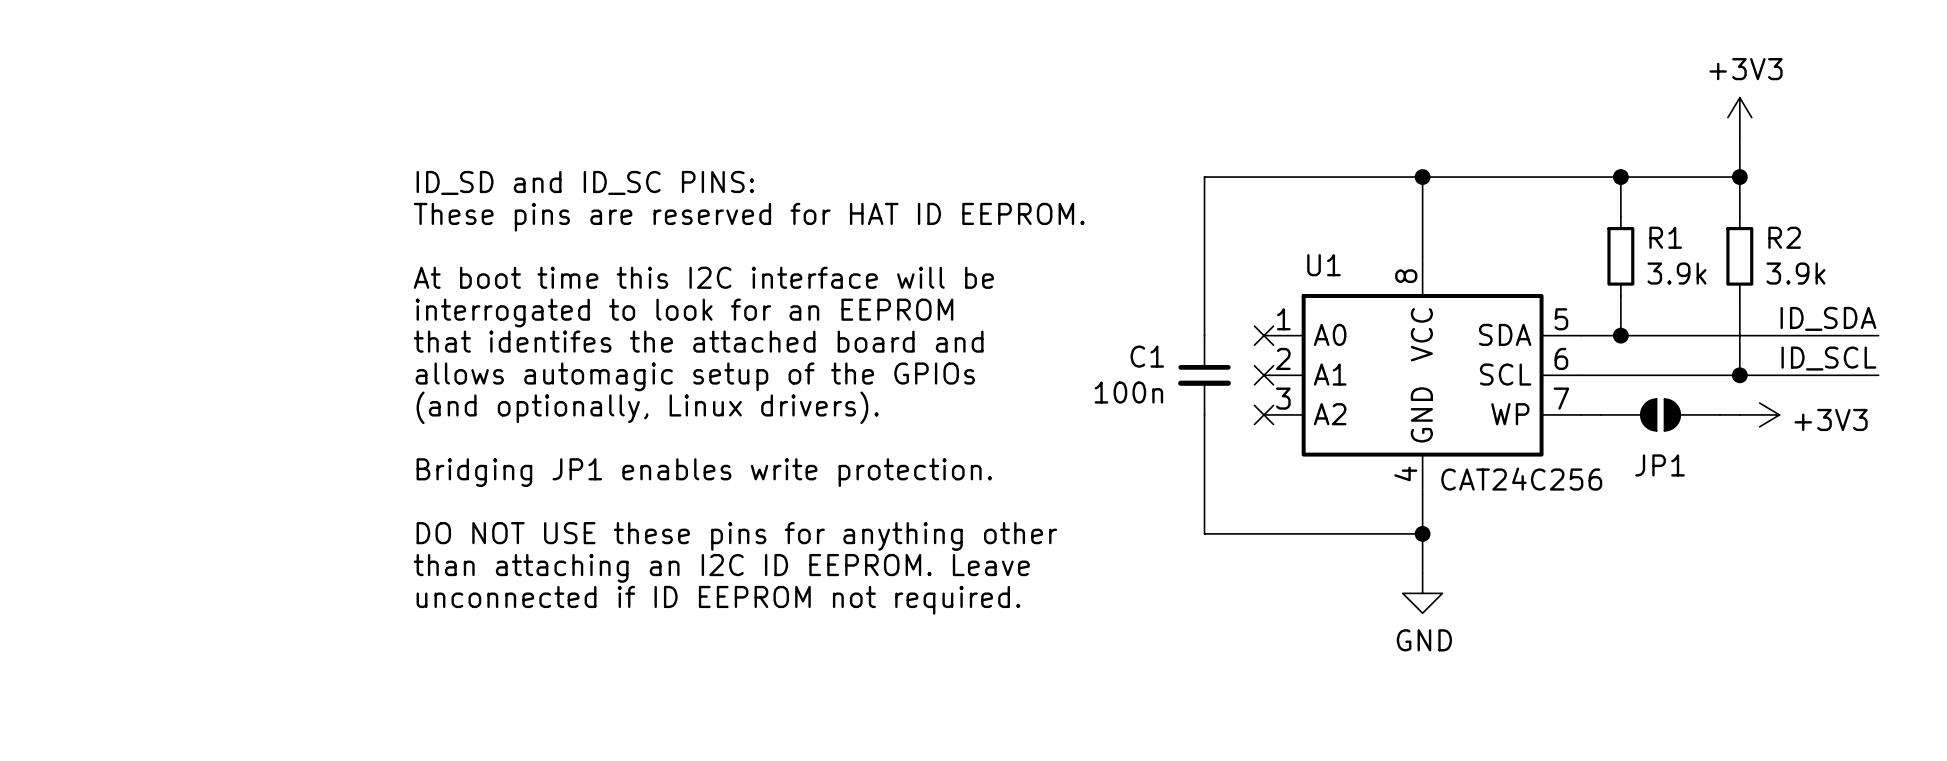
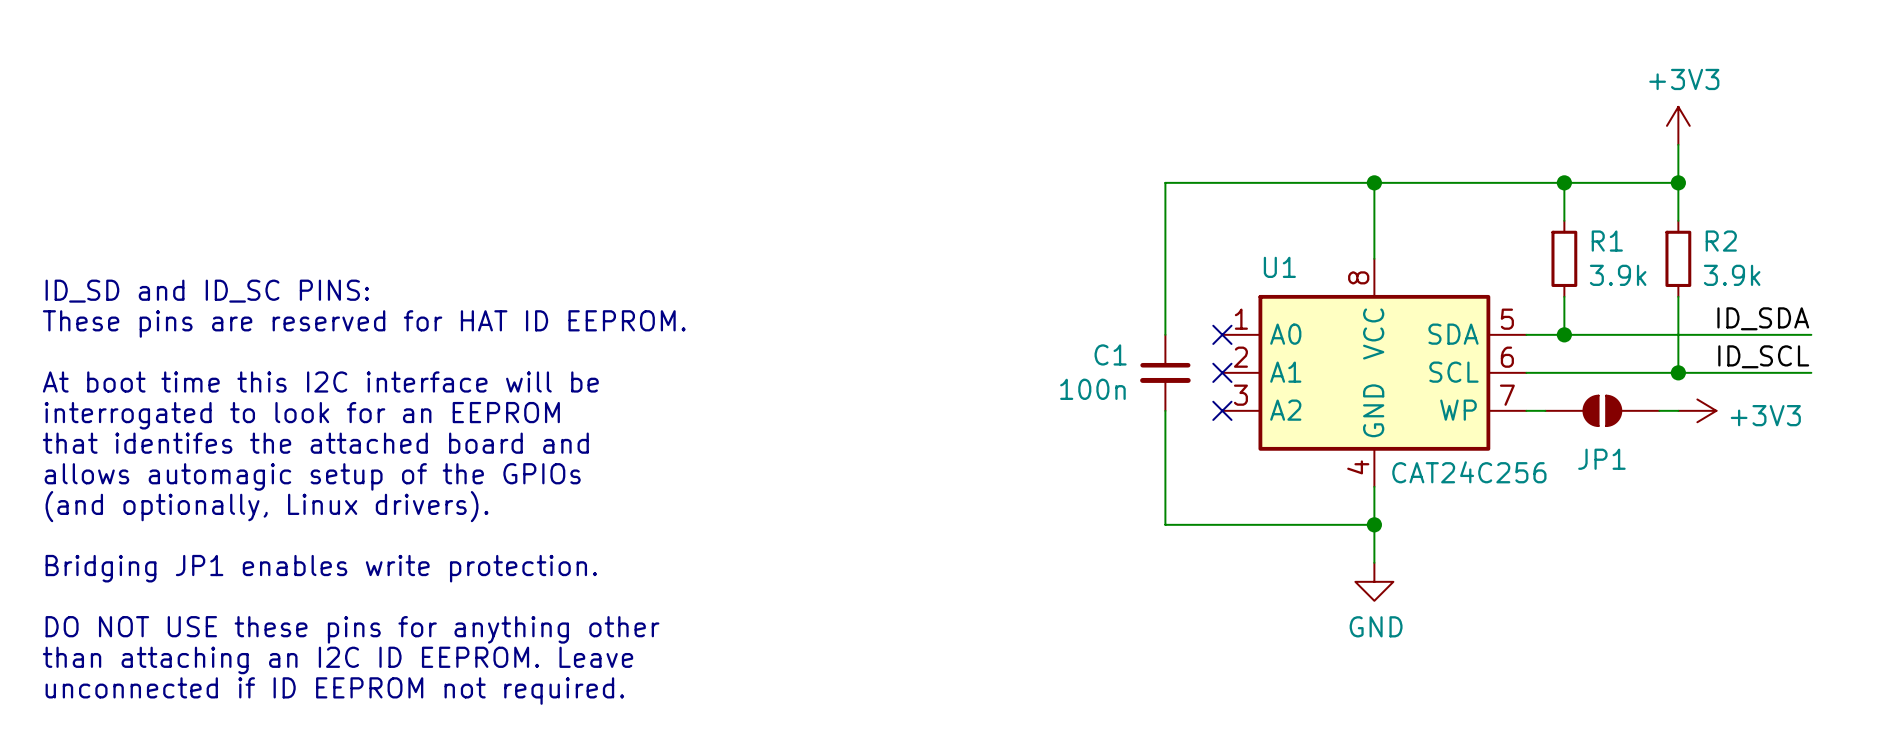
text: ID_SD and ID_SC PINS: (585, 182) -> none
text: These pins are reserved for HAT ID EEPROM. (749, 217) -> none
text: At boot time this I2C interface will be (703, 277) -> none
text: none -> ID_SD and ID_SC PINS: (207, 291)
text: interrogated to look for an EEPROM (684, 312) -> none
text: none -> These pins are reserved for HAT ID EEPROM. (364, 323)
text: that identifes the attached board and (698, 341) -> none
text: allows automagic setup of the GPIOs (695, 376) -> none
text: none -> At boot time this I2C interface will be (320, 381)
text: (and optionally, Linux drivers). (647, 407) -> none
text: none -> interrogated to look for an EEPROM (302, 415)
text: none -> that identifes the attached board and (315, 443)
text: Bridging JP1 enables write protection. (704, 472) -> none
text: none -> allows automagic setup of the GPIOs (312, 476)
text: none -> (and optionally, Linux drivers). (267, 506)
text: DO NOT USE these pins for anything other (736, 536) -> none
text: than attaching an I2C ID EEPROM. Leave (721, 568) -> none
text: none -> Bridging JP1 enables write protection. (321, 568)
text: unconnected if ID EEPROM not required. (718, 600) -> none
text: none -> DO NOT USE these pins for anything other (352, 629)
text: none -> than attaching an I2C ID EEPROM. Leave (338, 660)
text: none -> unconnected if ID EEPROM not required. (334, 691)

